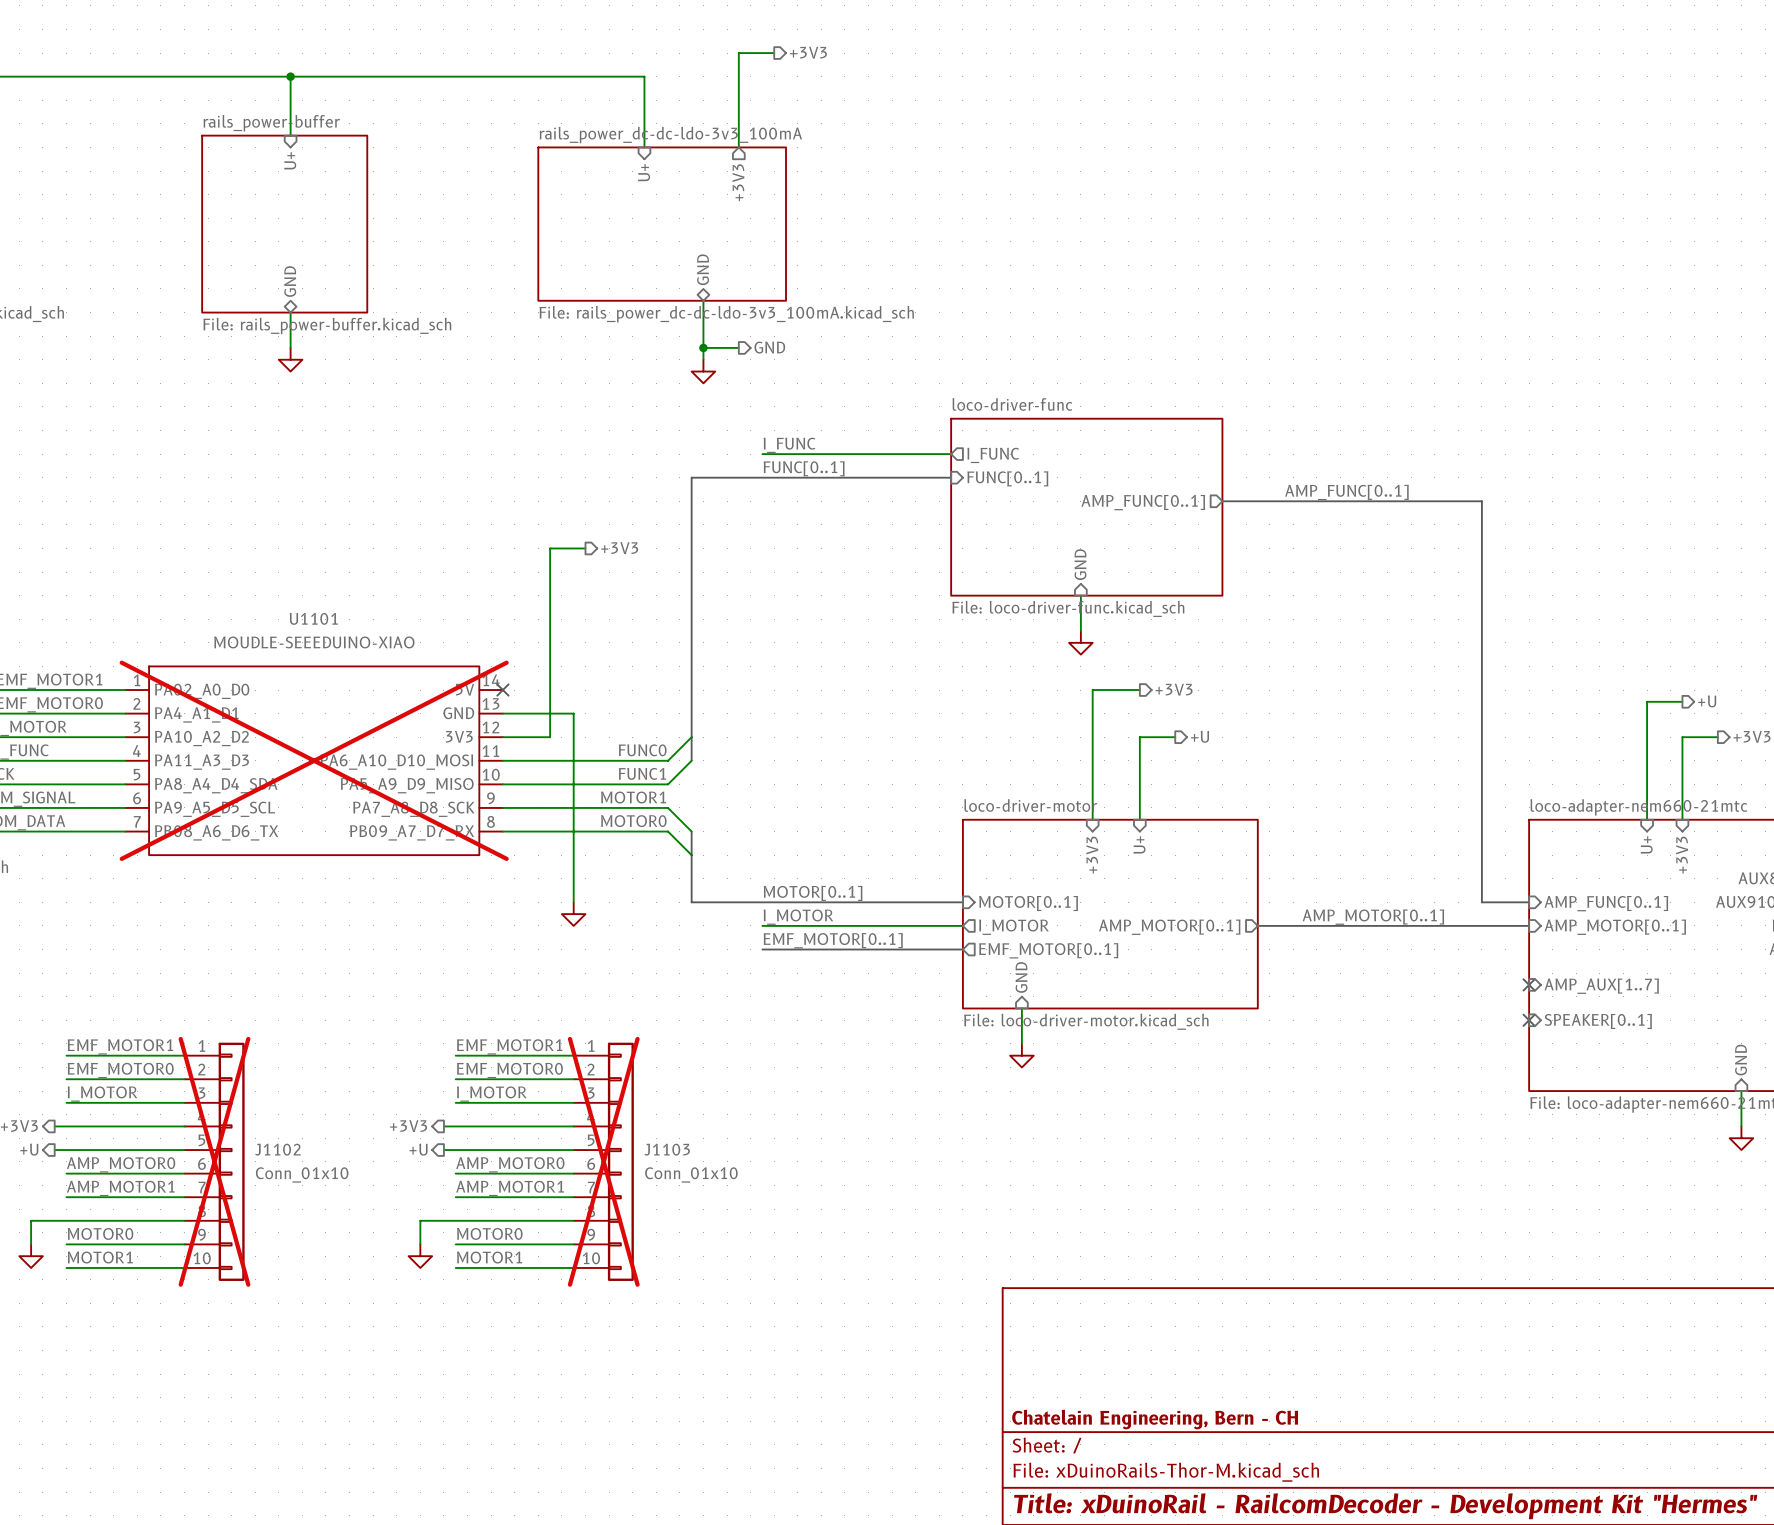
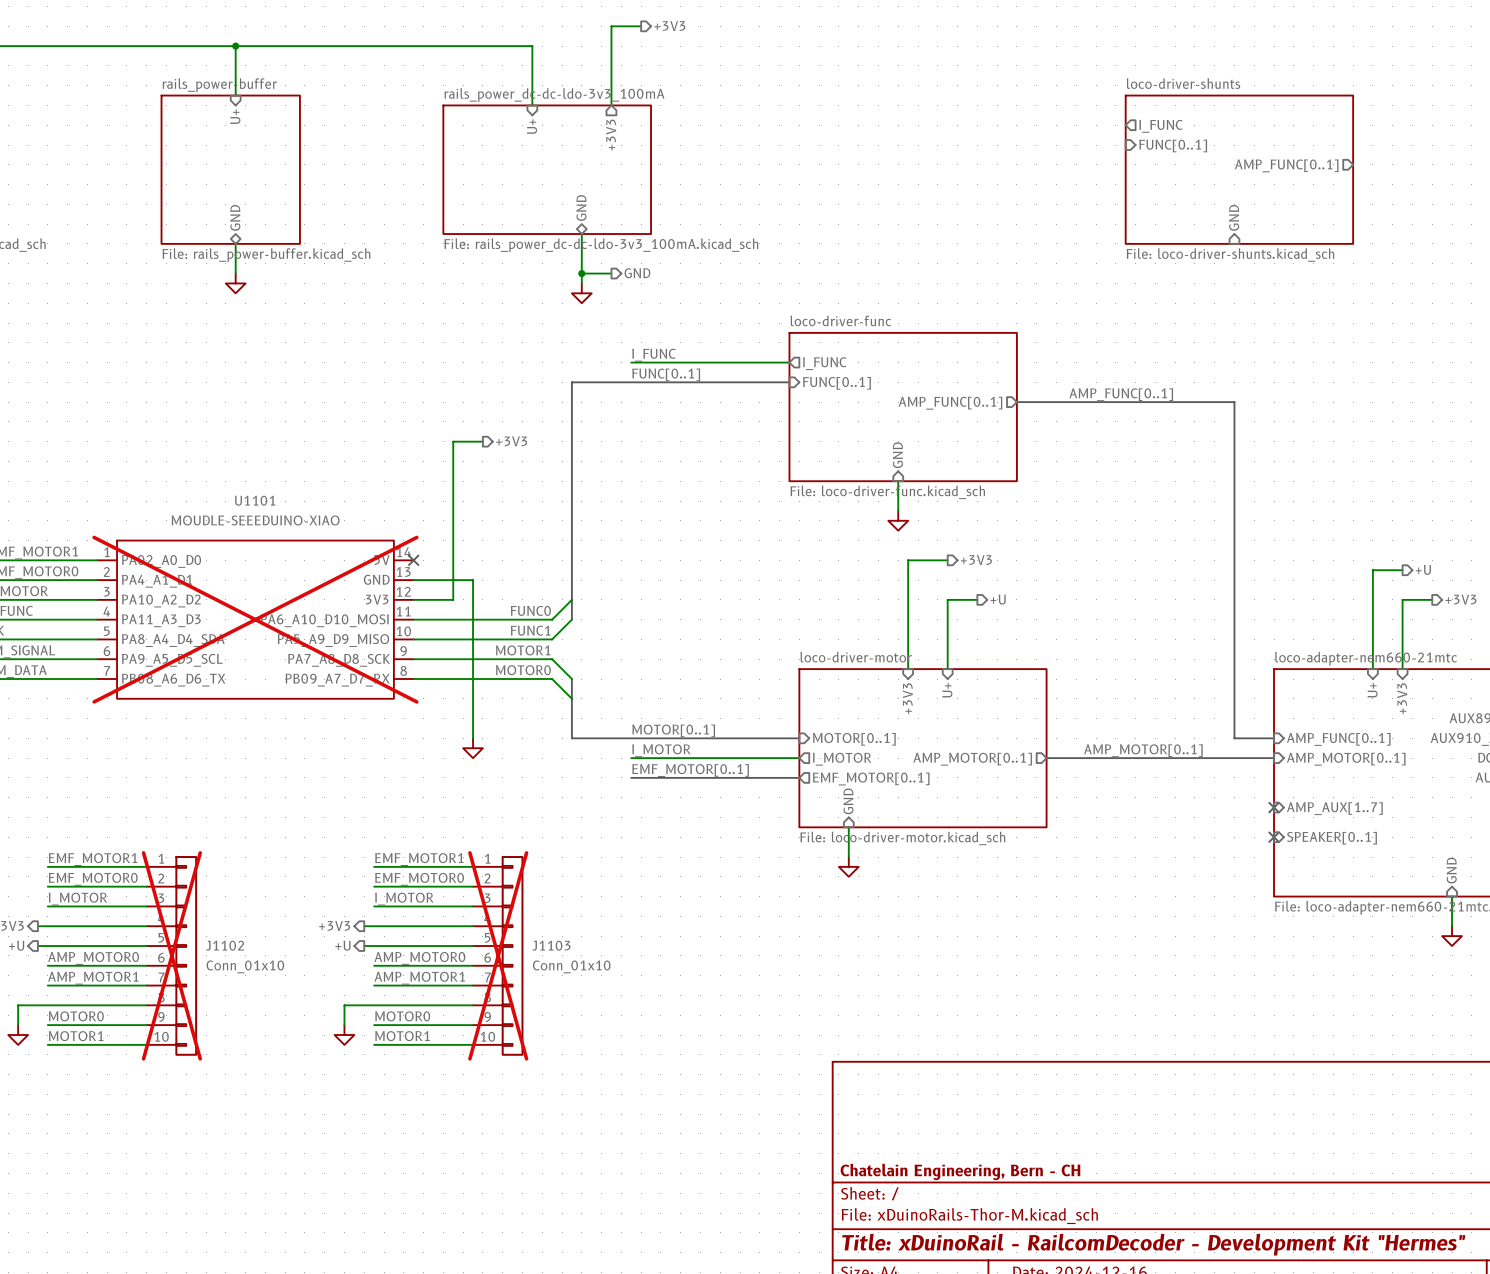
sheet pin: none -> I_FUNC (1160, 126)
sheet pin: none -> FUNC[0..1] (1173, 146)
sheet pin: none -> AMP_FUNC[0..1] (1286, 165)
sheet loco-driver-shunts: none -> File: loco-driver-shunts.kicad_sch (1239, 169)
sheet pin: none -> GND (1234, 217)

